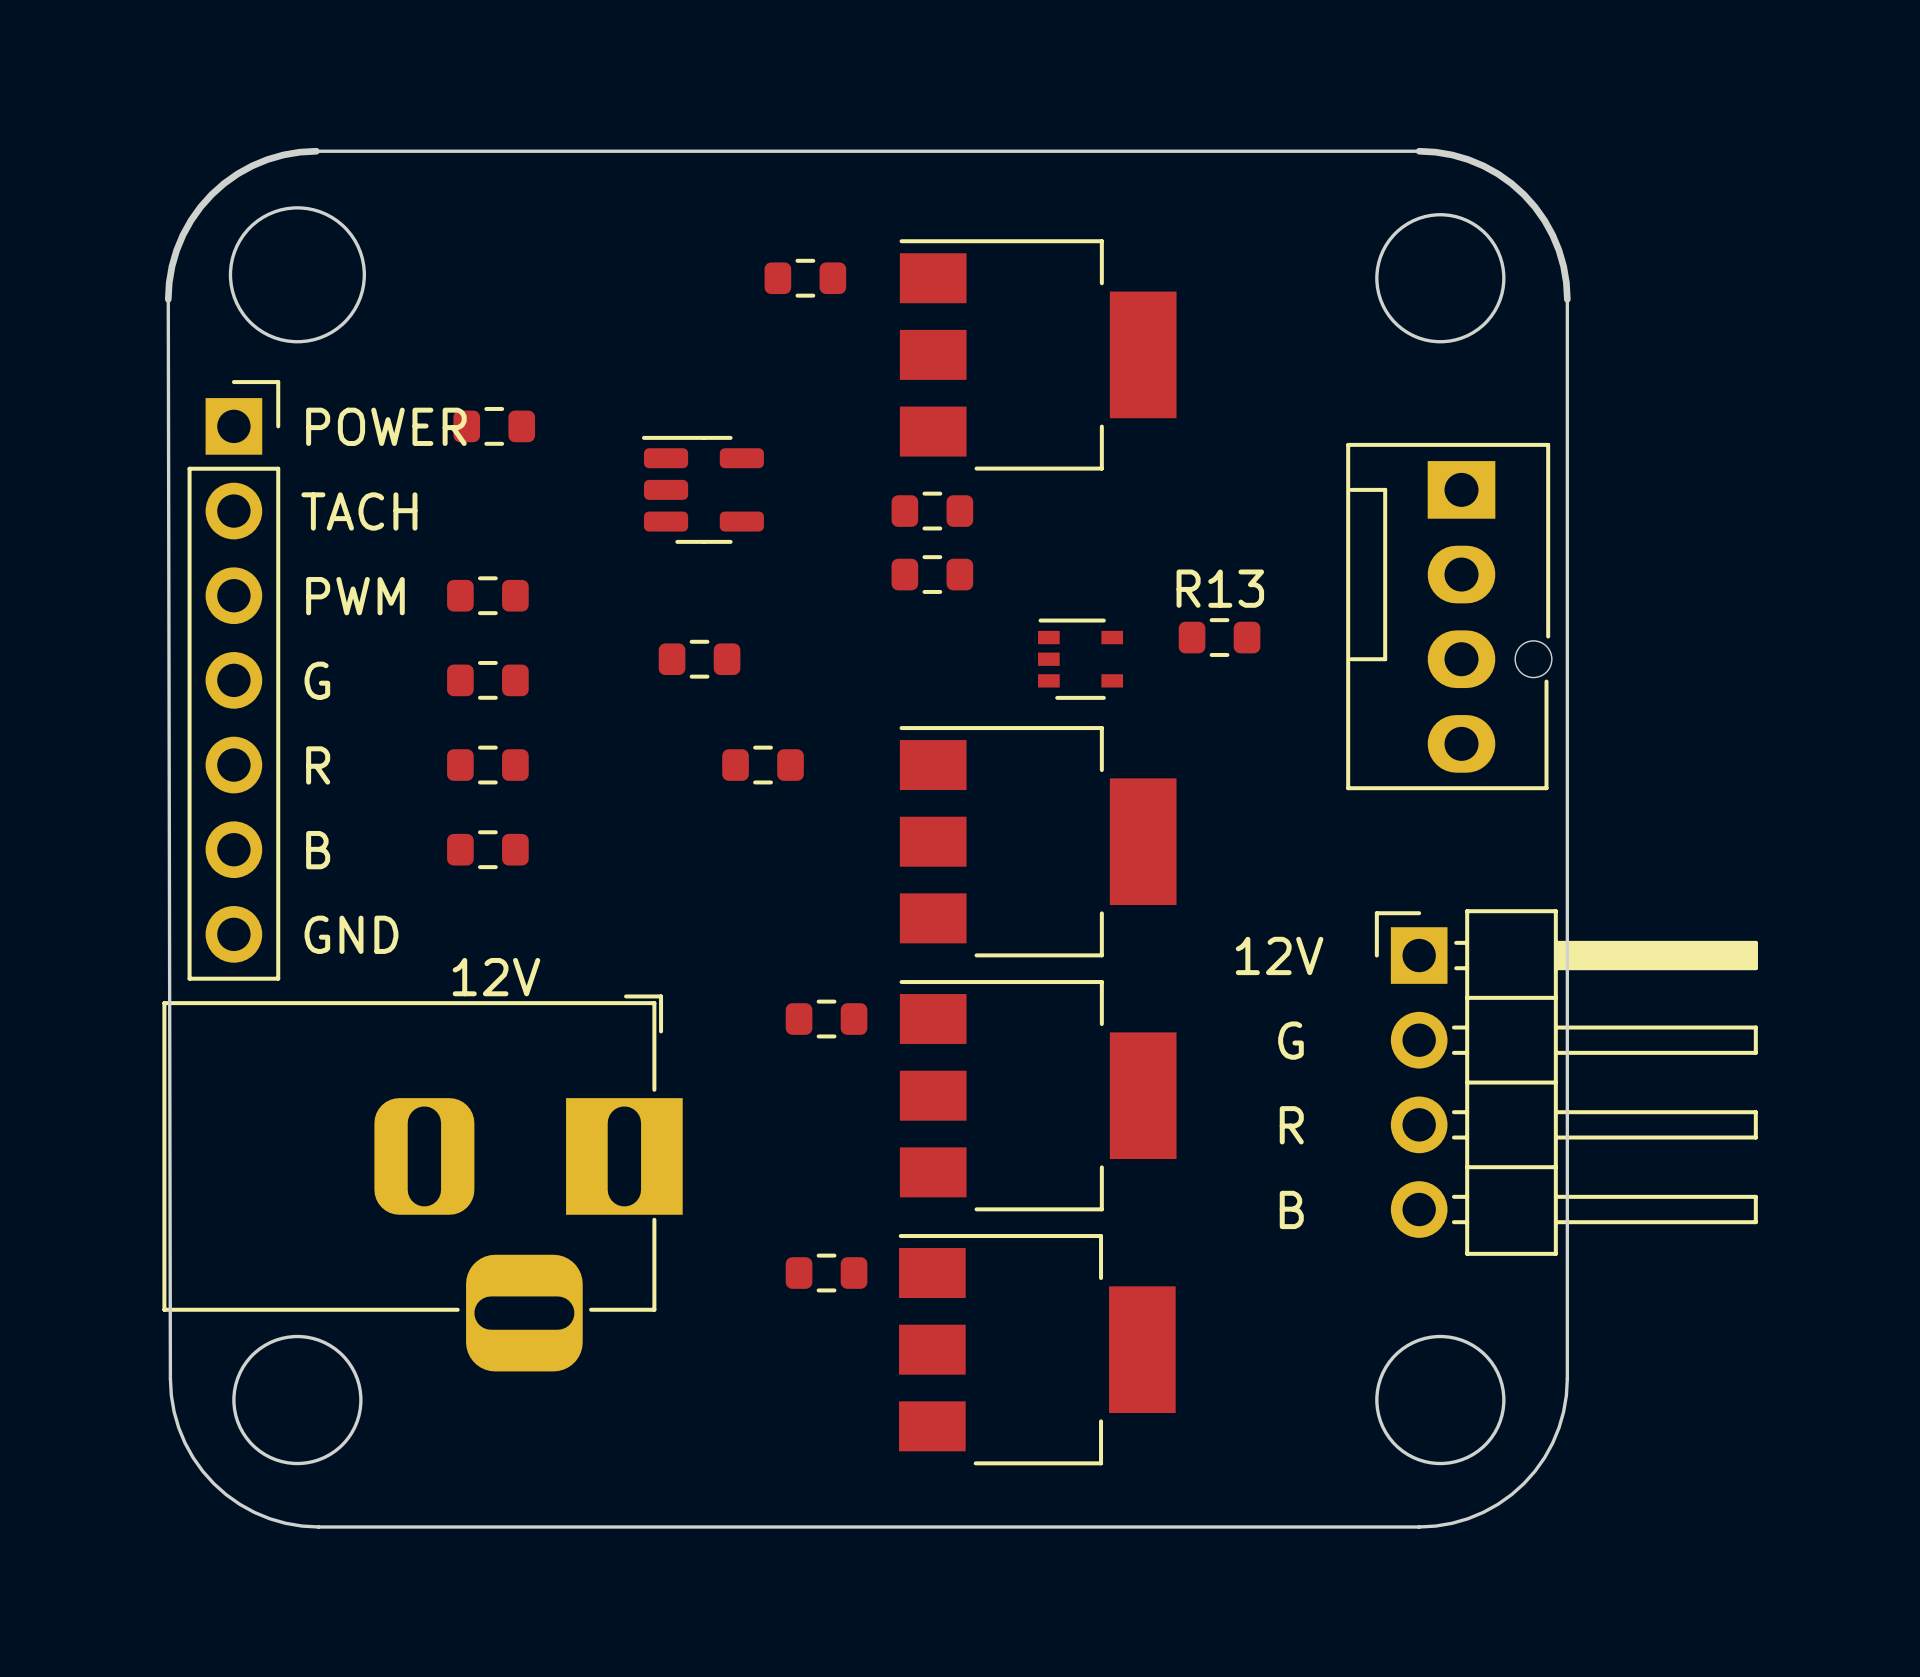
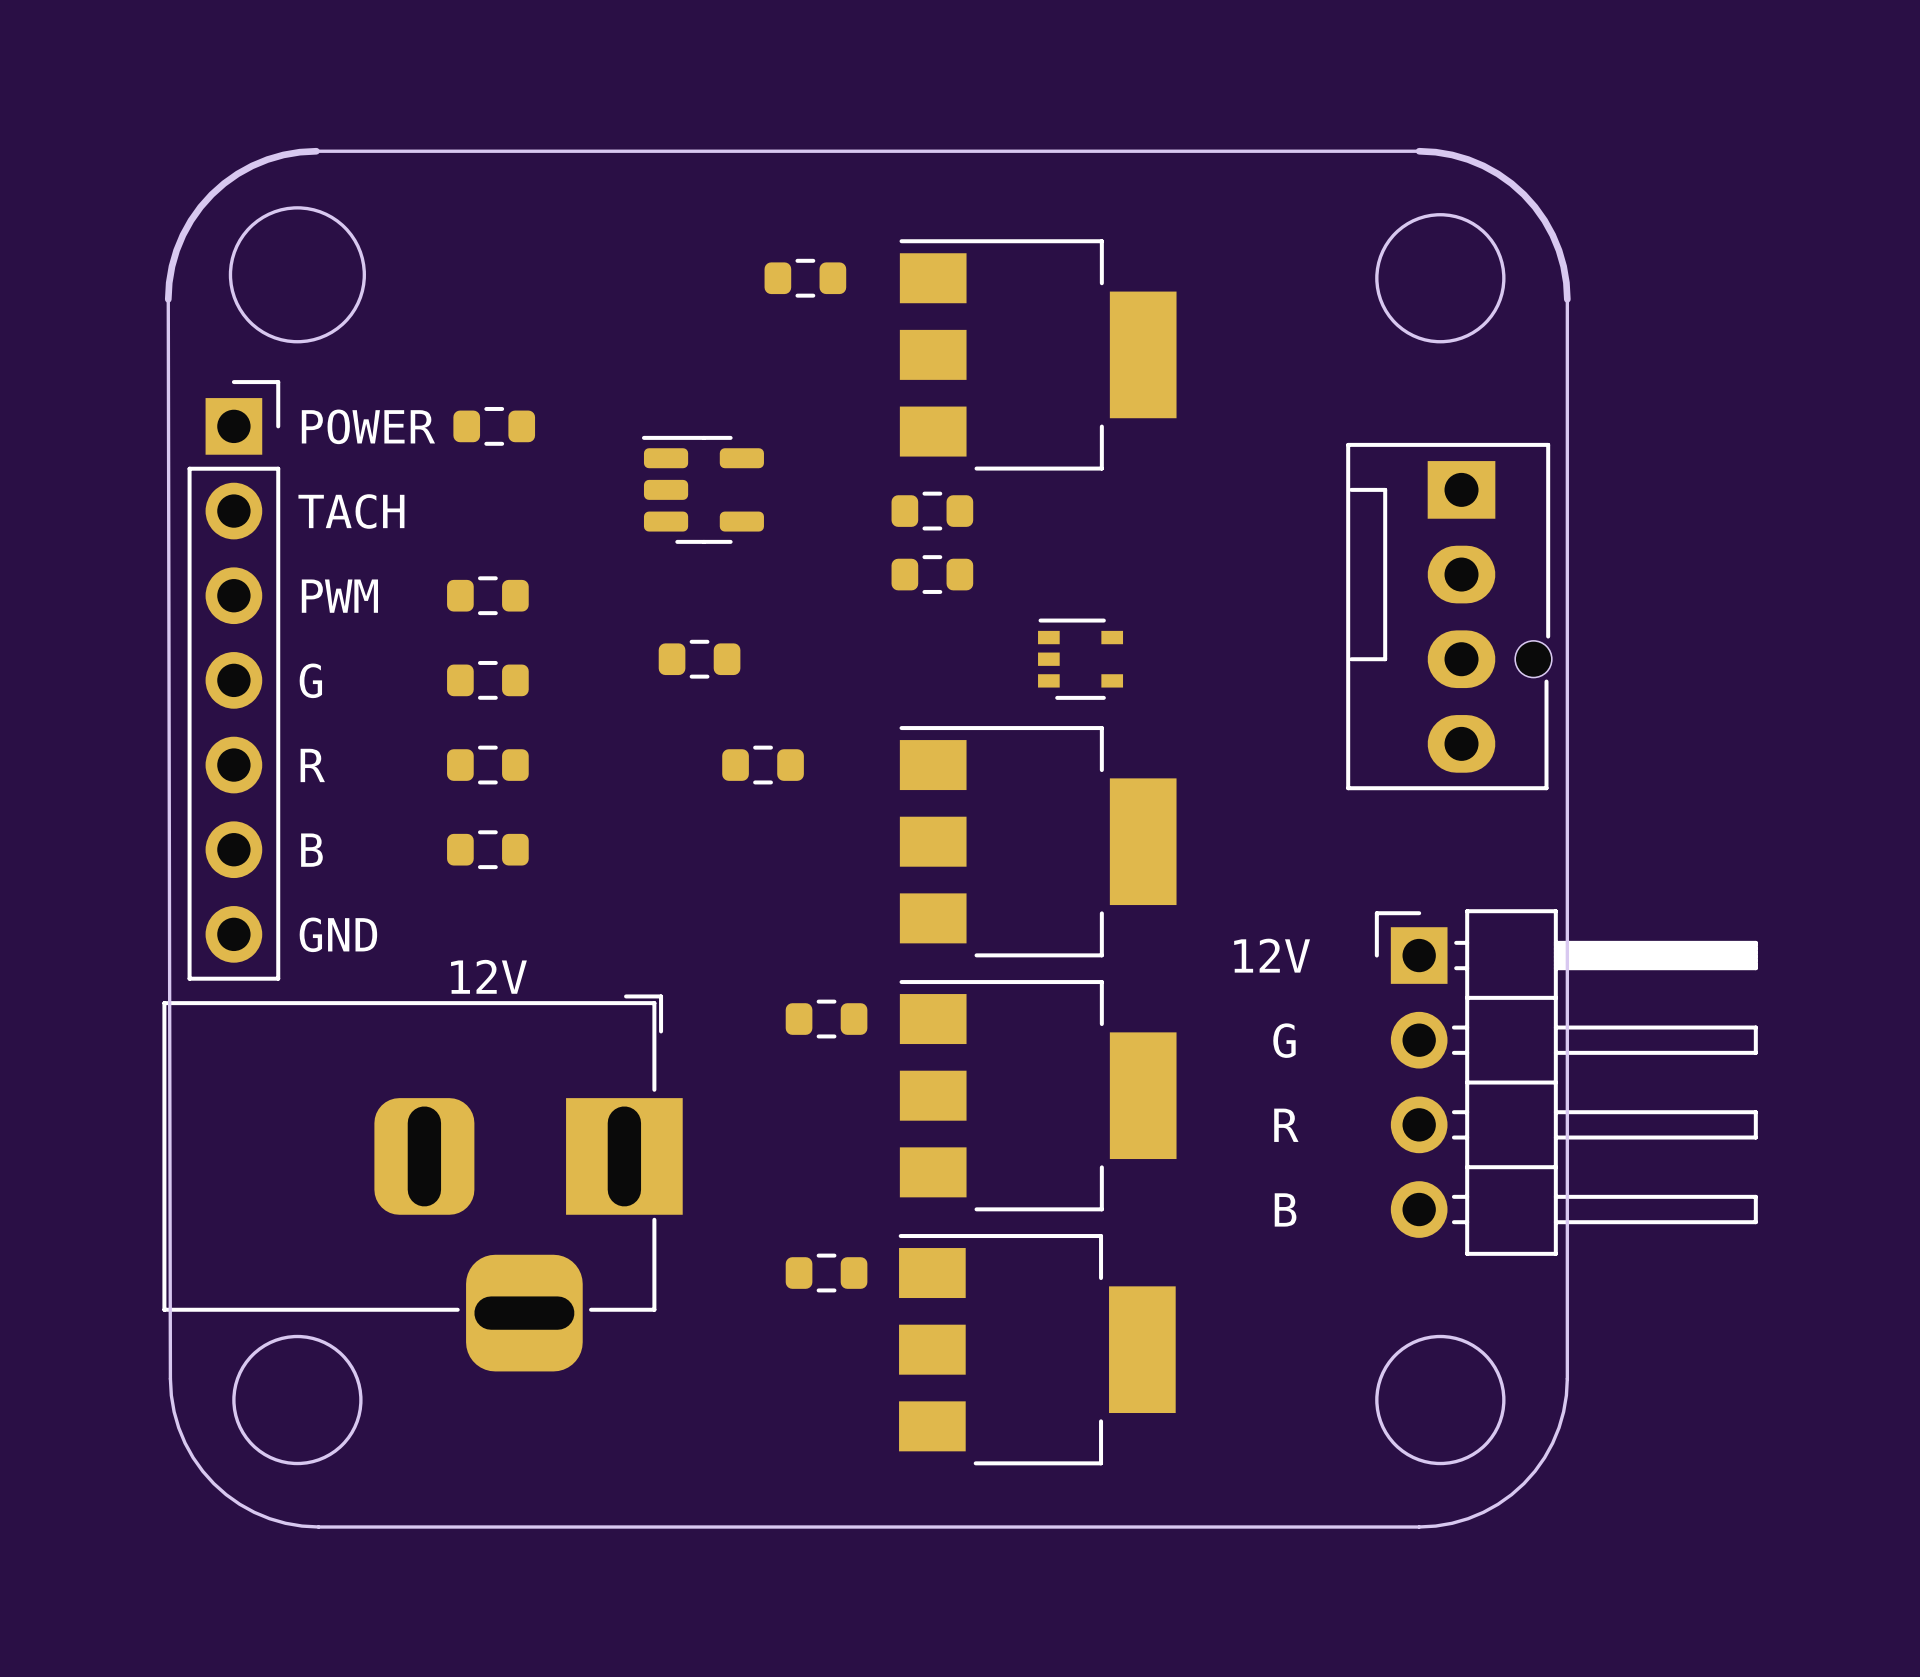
R13: (1219, 637) -> none

